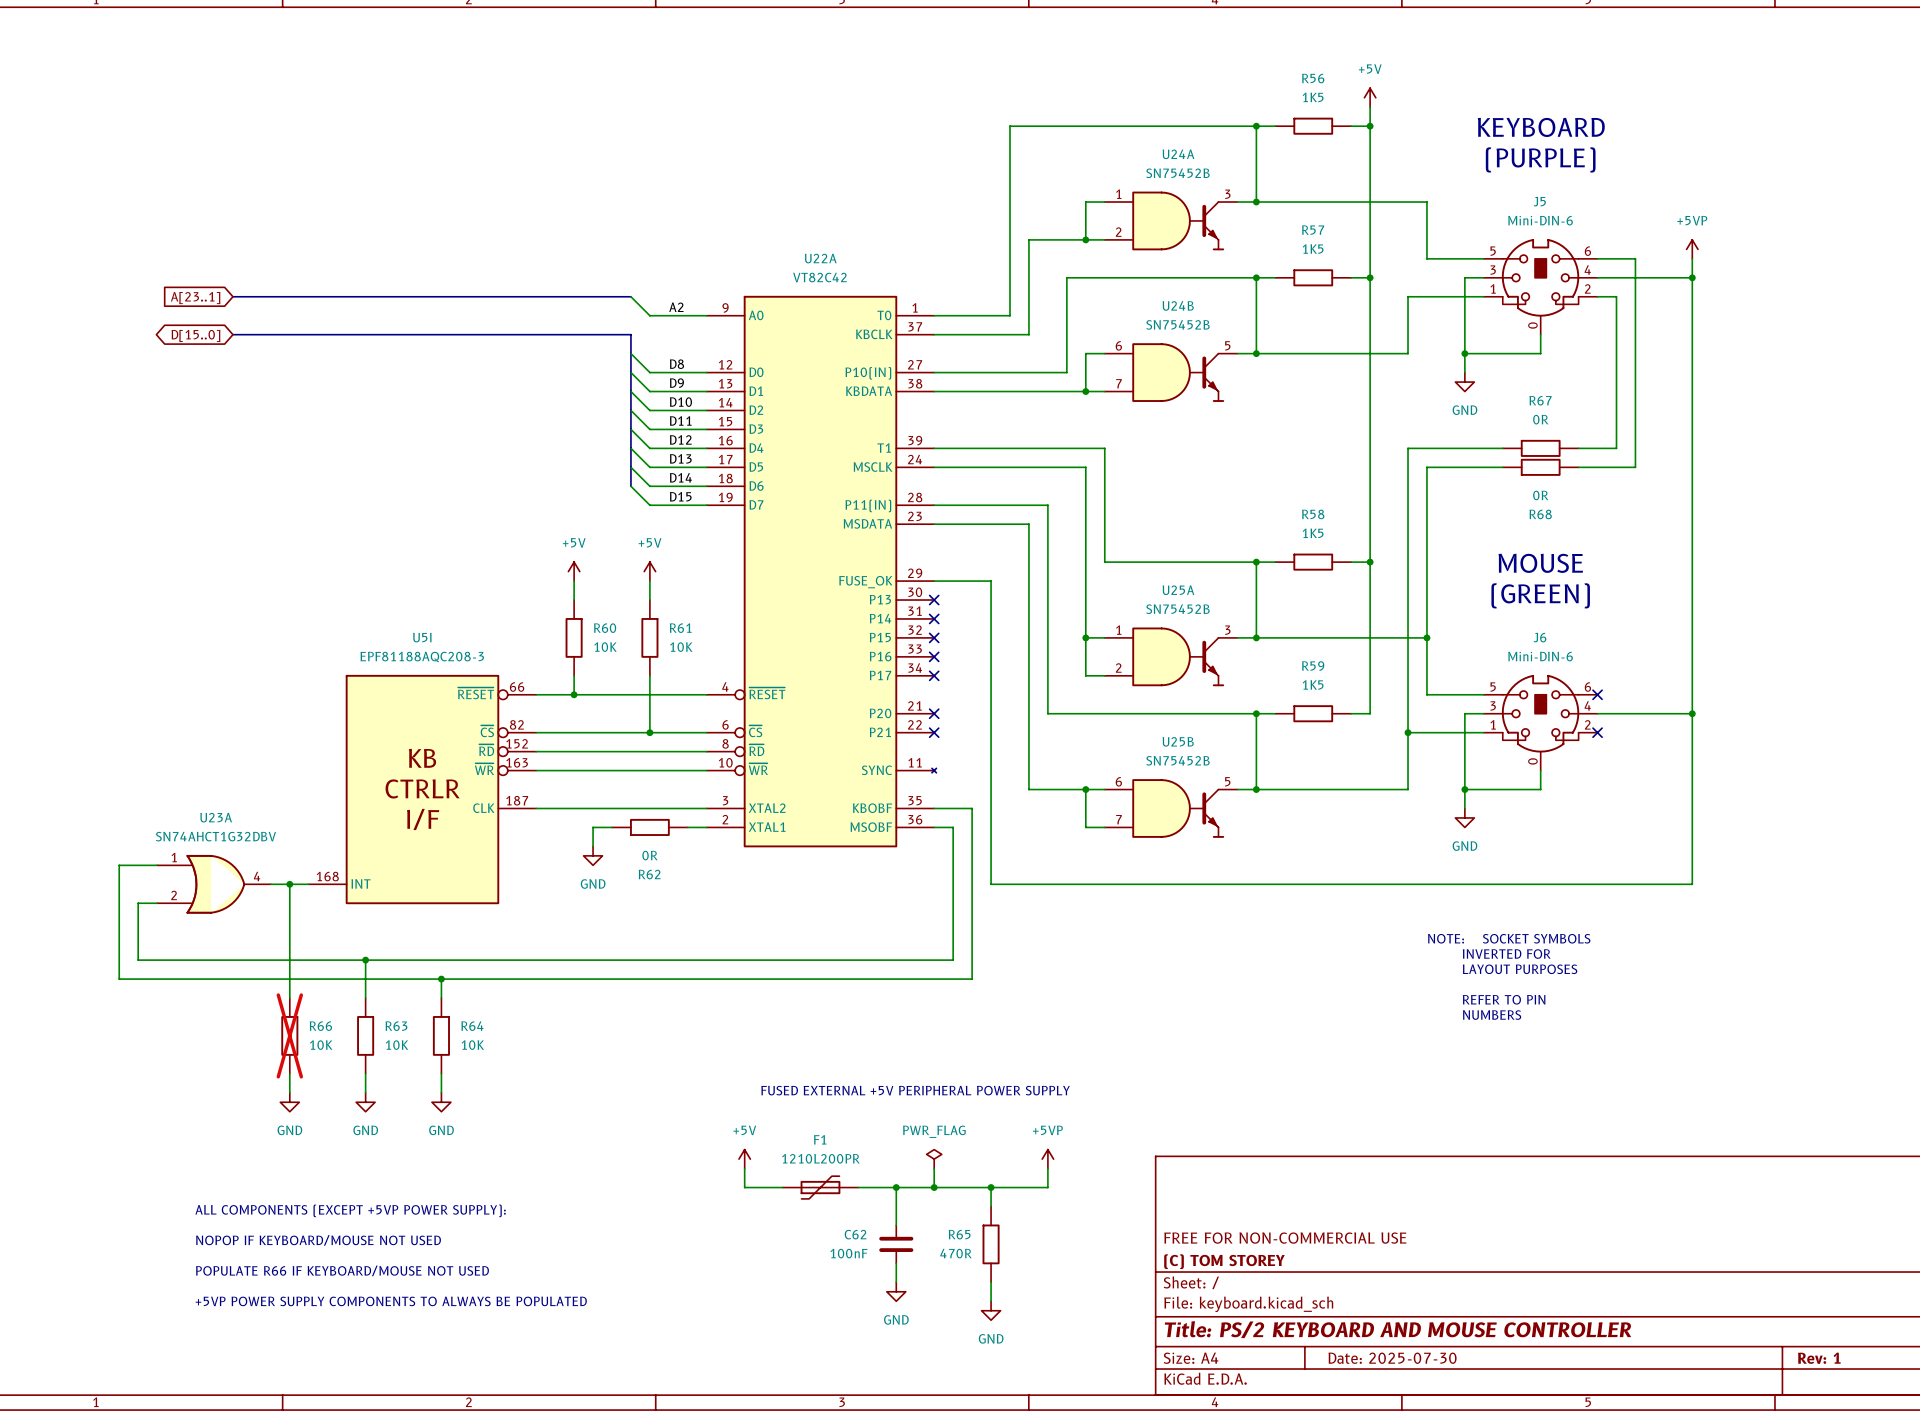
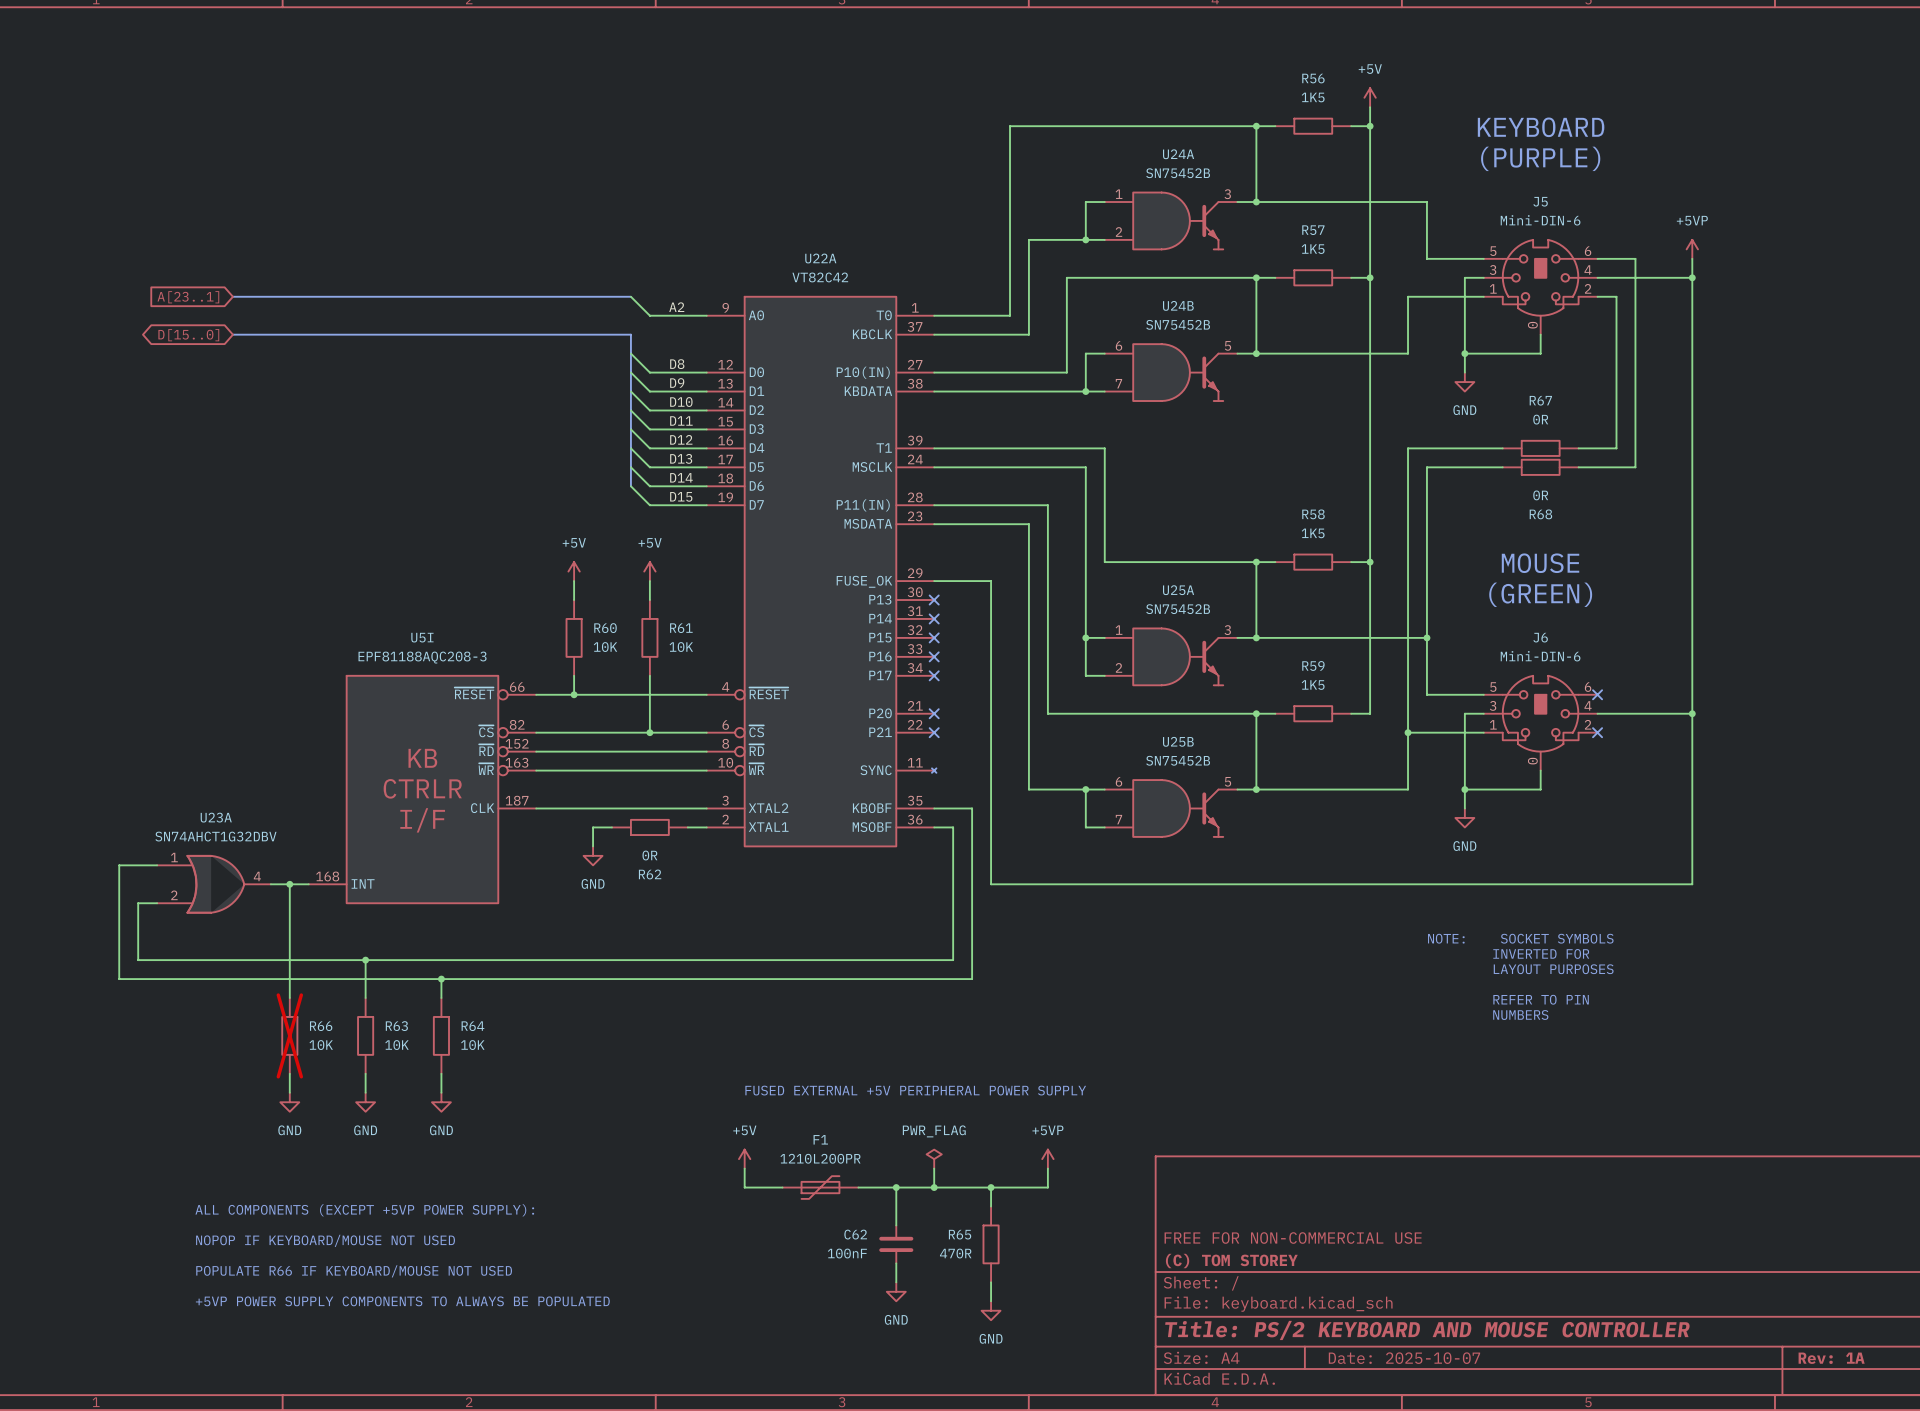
title block: Date: 2025-07-30 (1392, 1358) -> Date: 2025-10-07 (1404, 1358)
title block: Rev: 1 (1819, 1358) -> Rev: 1A (1831, 1358)

